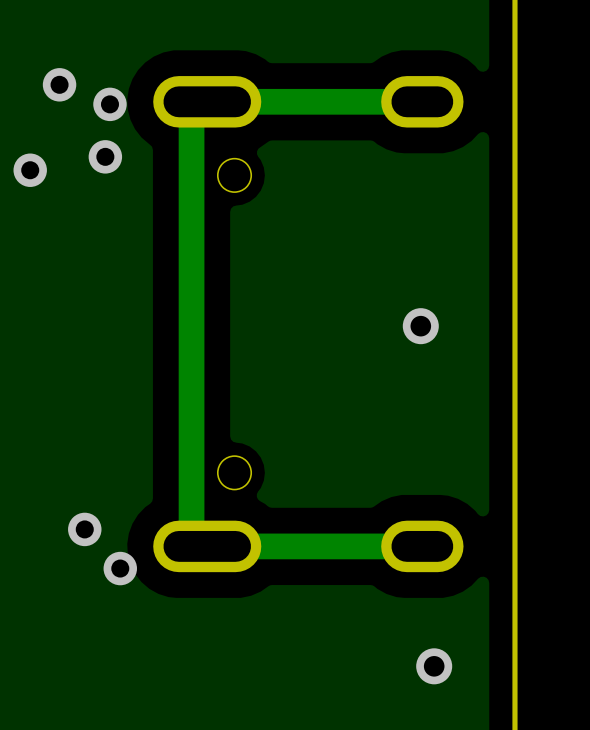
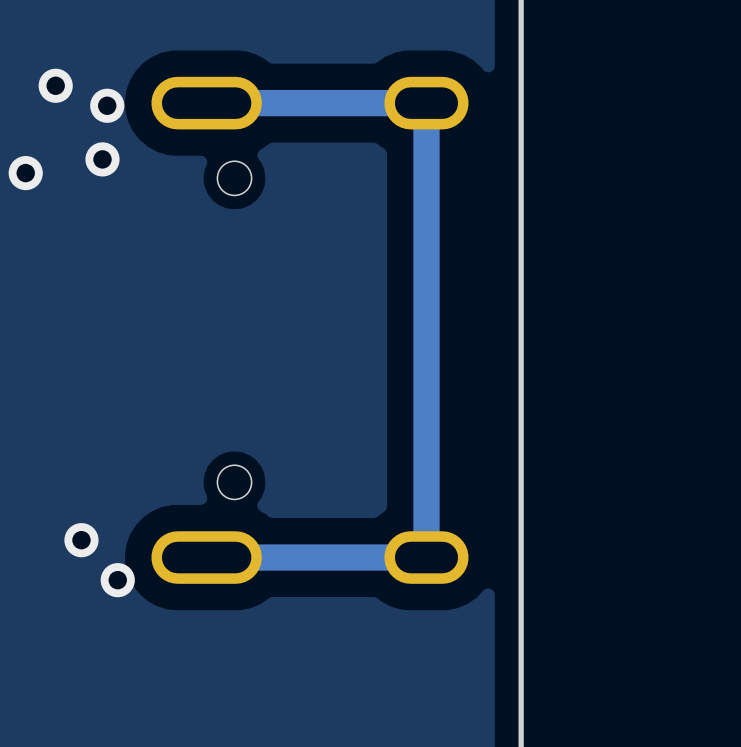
track: (207, 101) (191, 117) (191, 530) (207, 546) -> none
track: none -> (426, 103) (426, 557)
via: (420, 326) -> none
via: (434, 666) -> none

